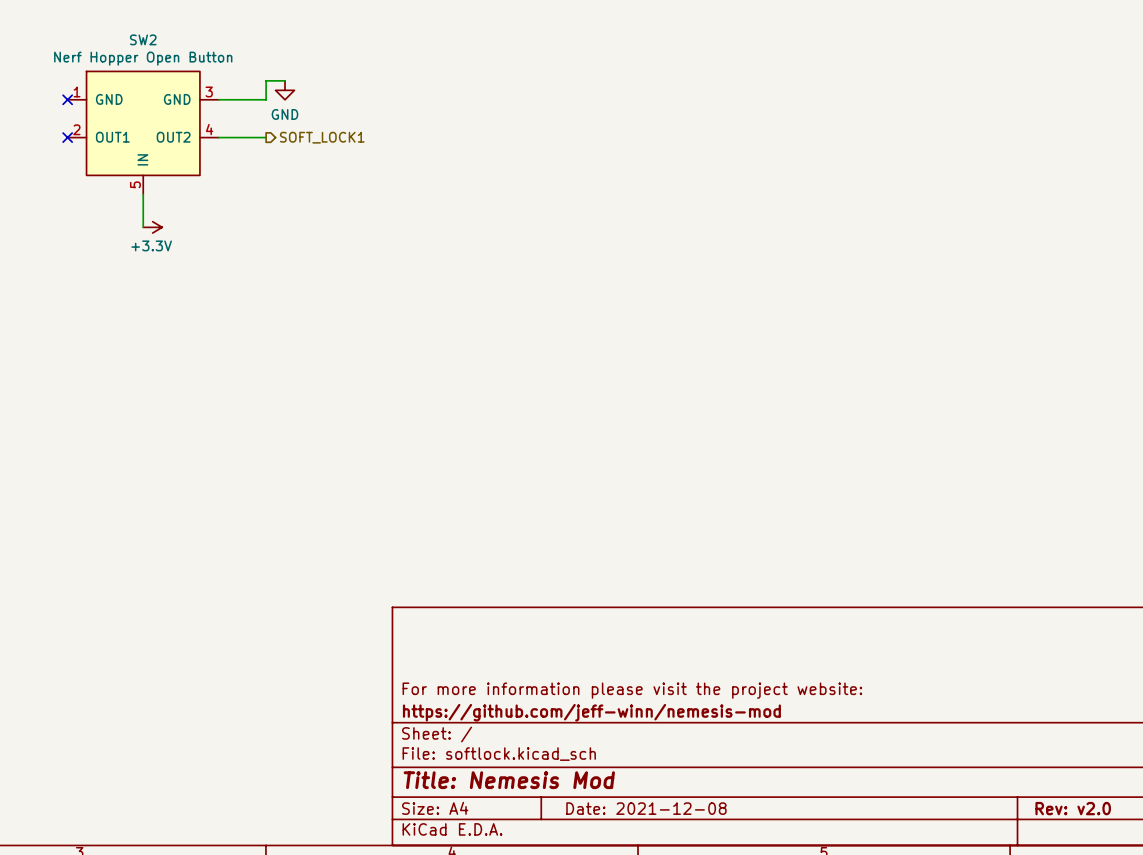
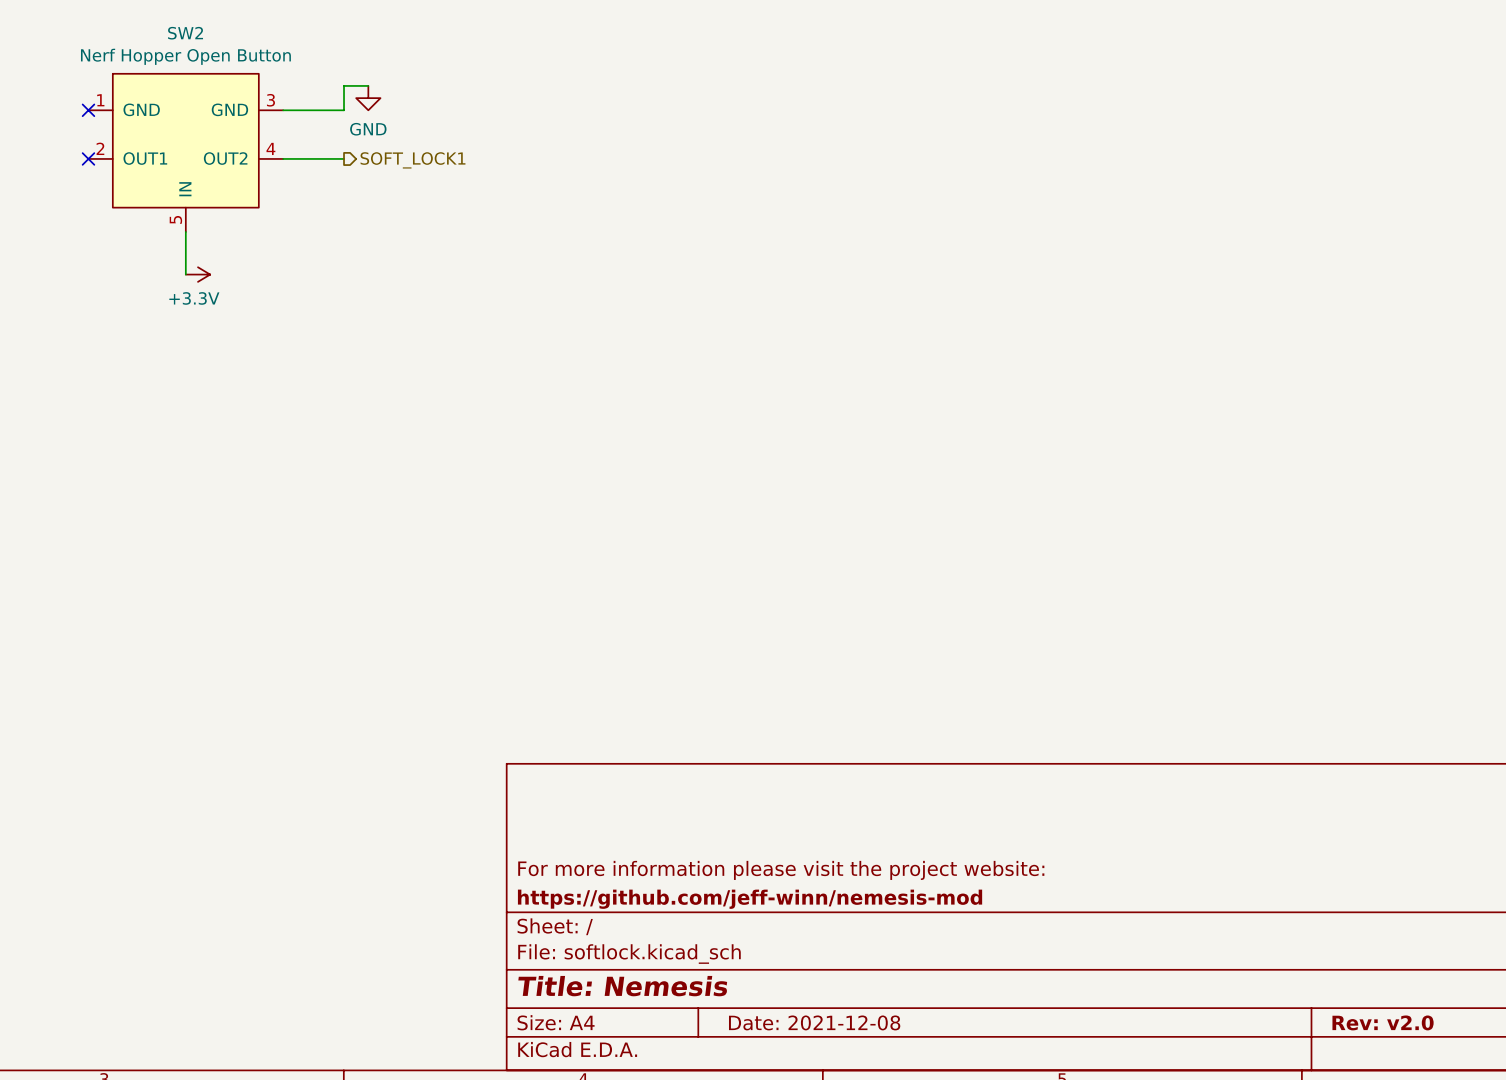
title block: Title: Nemesis Mod (509, 780) -> Title: Nemesis (622, 986)

